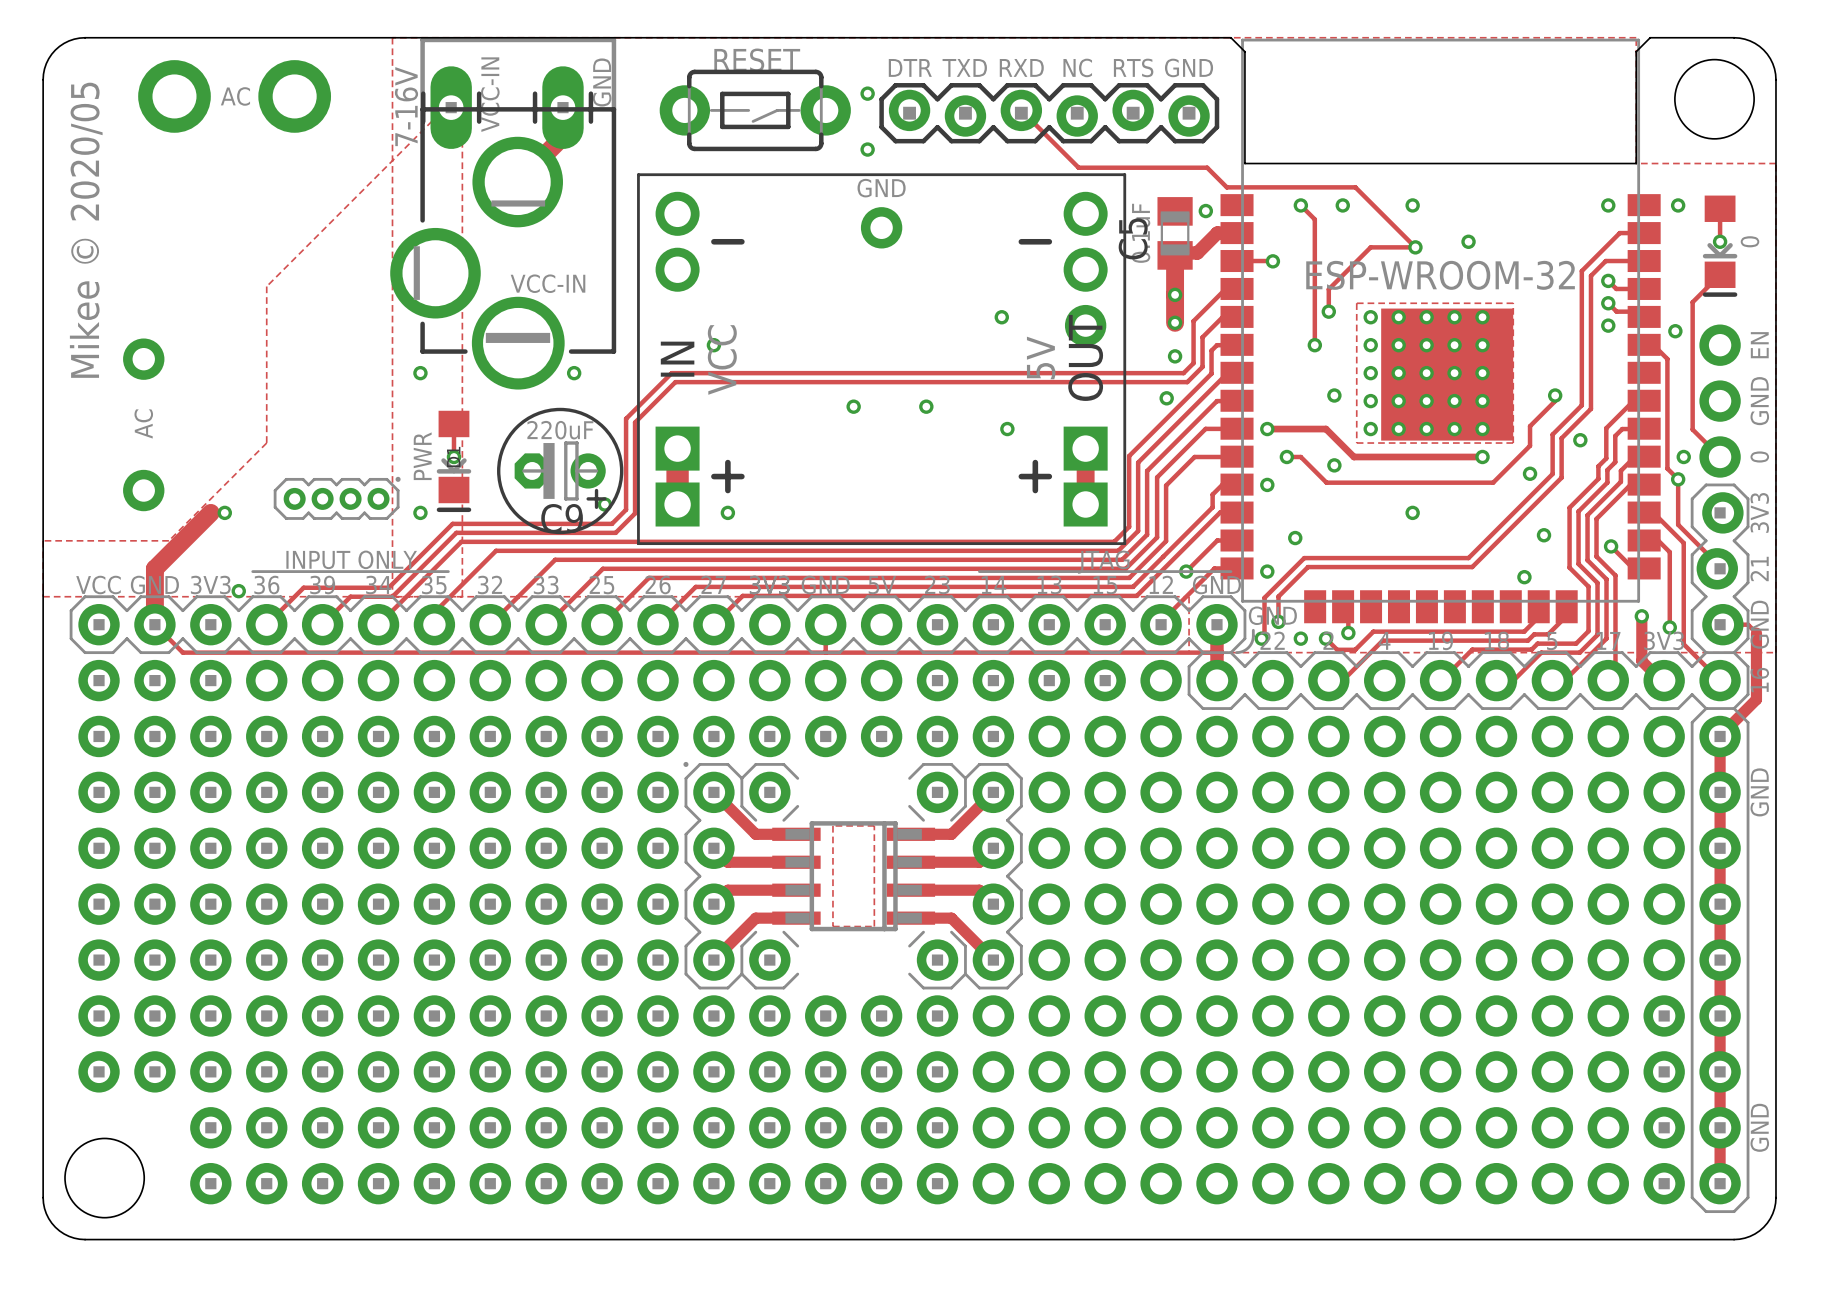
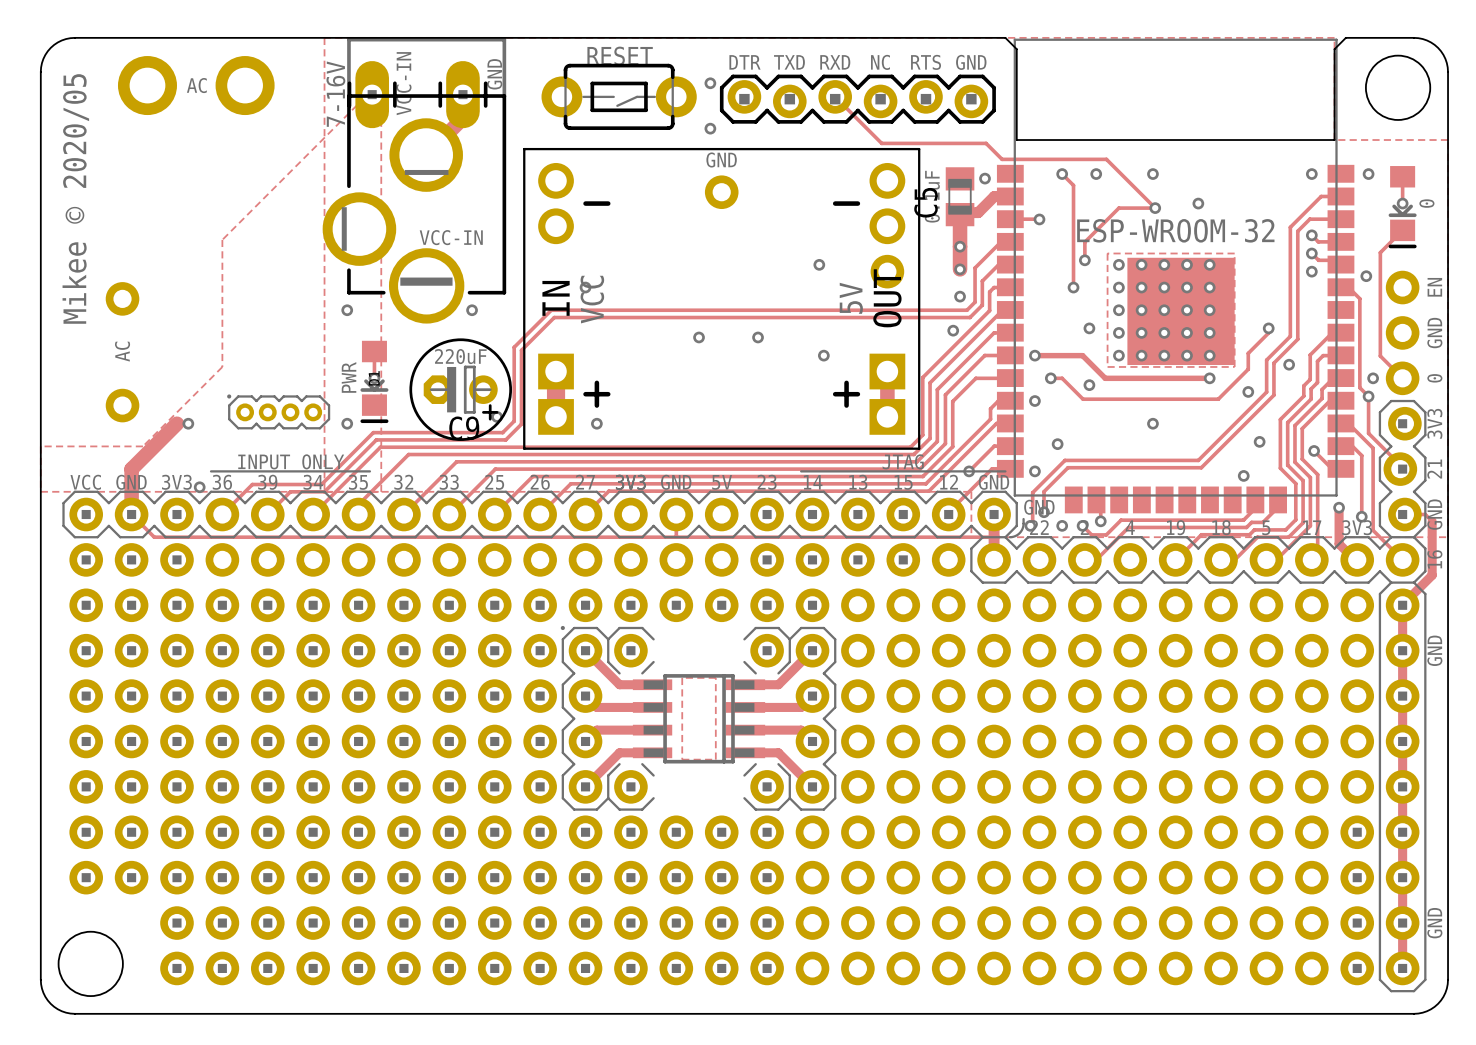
drawing position: (398, 479) -> (229, 396)

